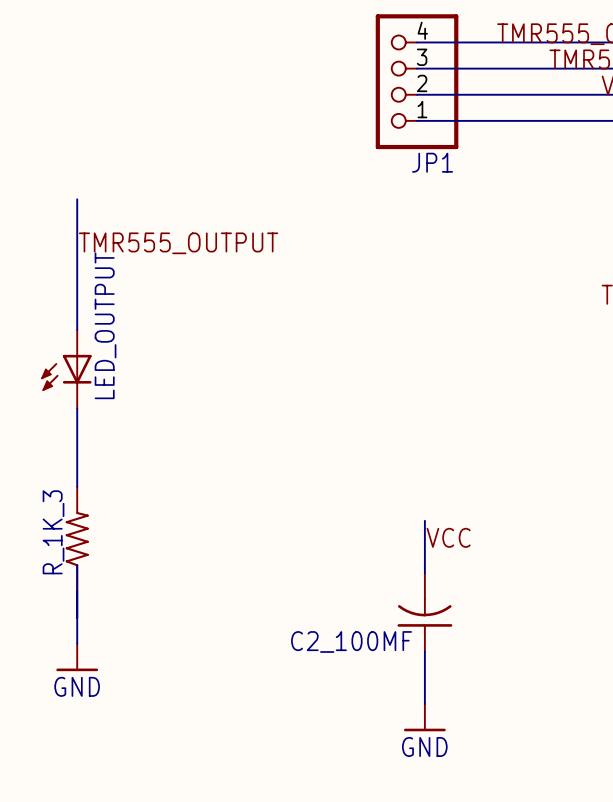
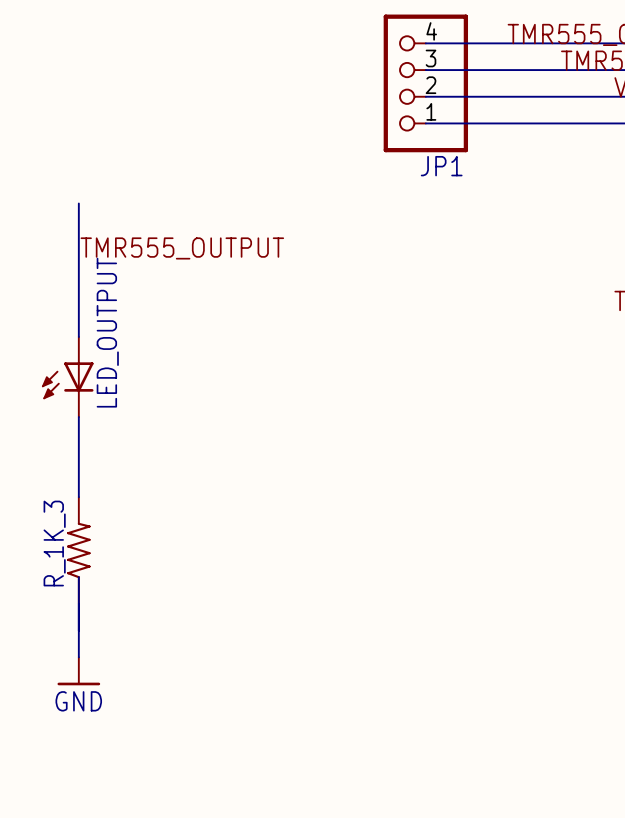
wire: (424, 520) (424, 573) -> none
label: VCC (448, 537) -> none
C2_100MF: (424, 612) -> none
wire: (424, 651) (424, 703) -> none
power symbol: GND (424, 717) -> none

